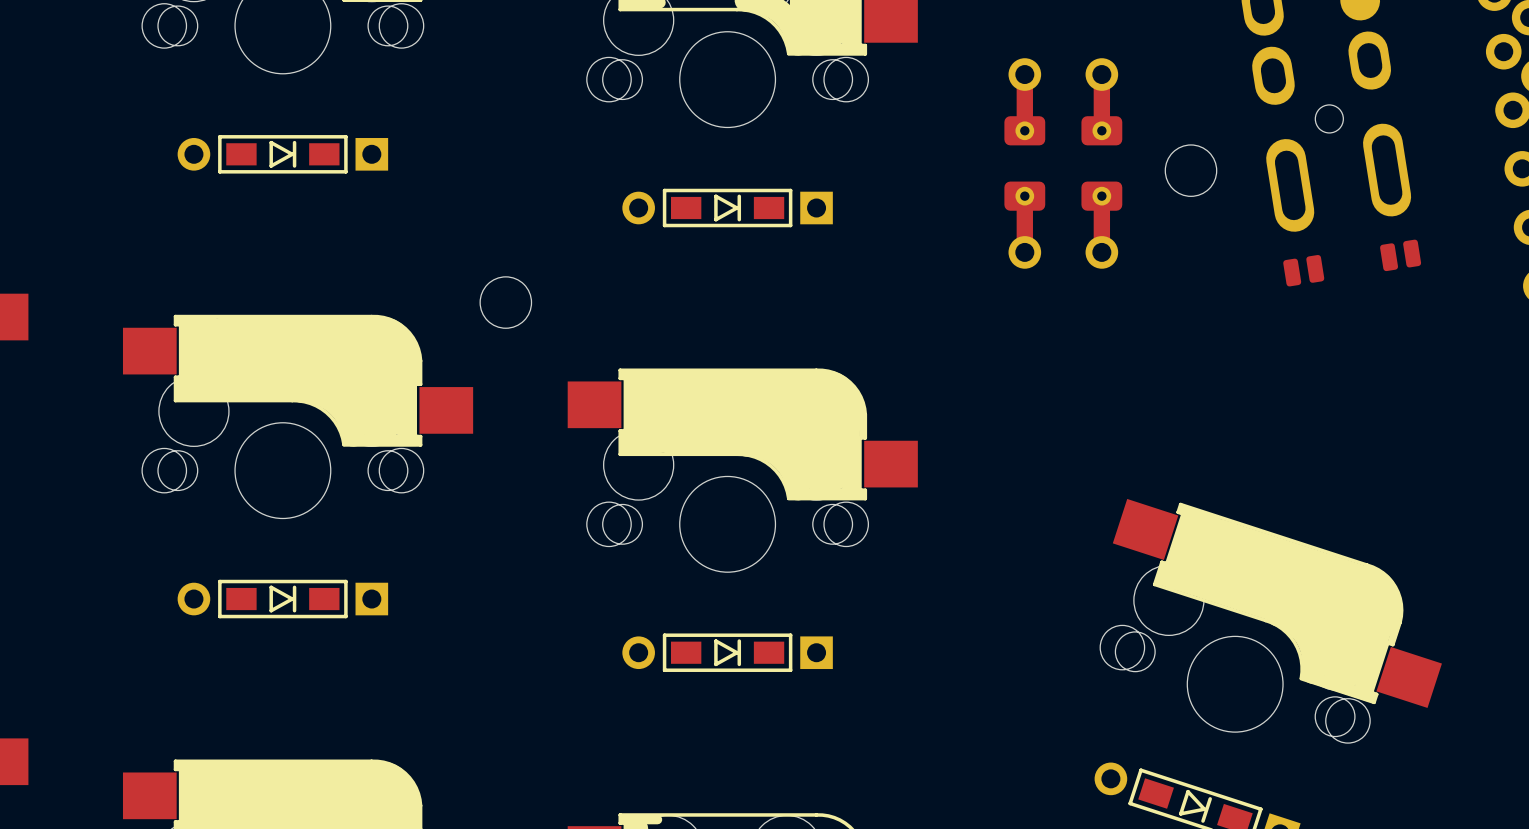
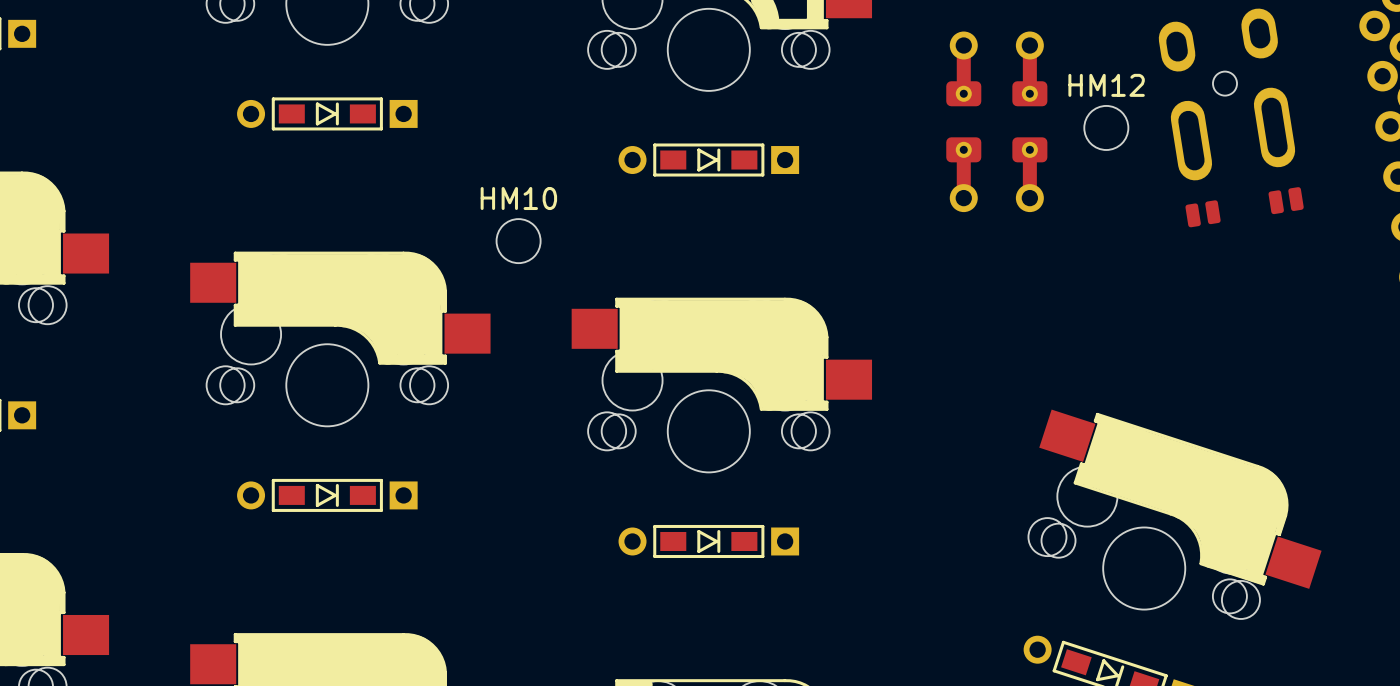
HM12 name: none -> HM12 (1106, 85)
HM10 name: none -> HM10 (518, 198)

